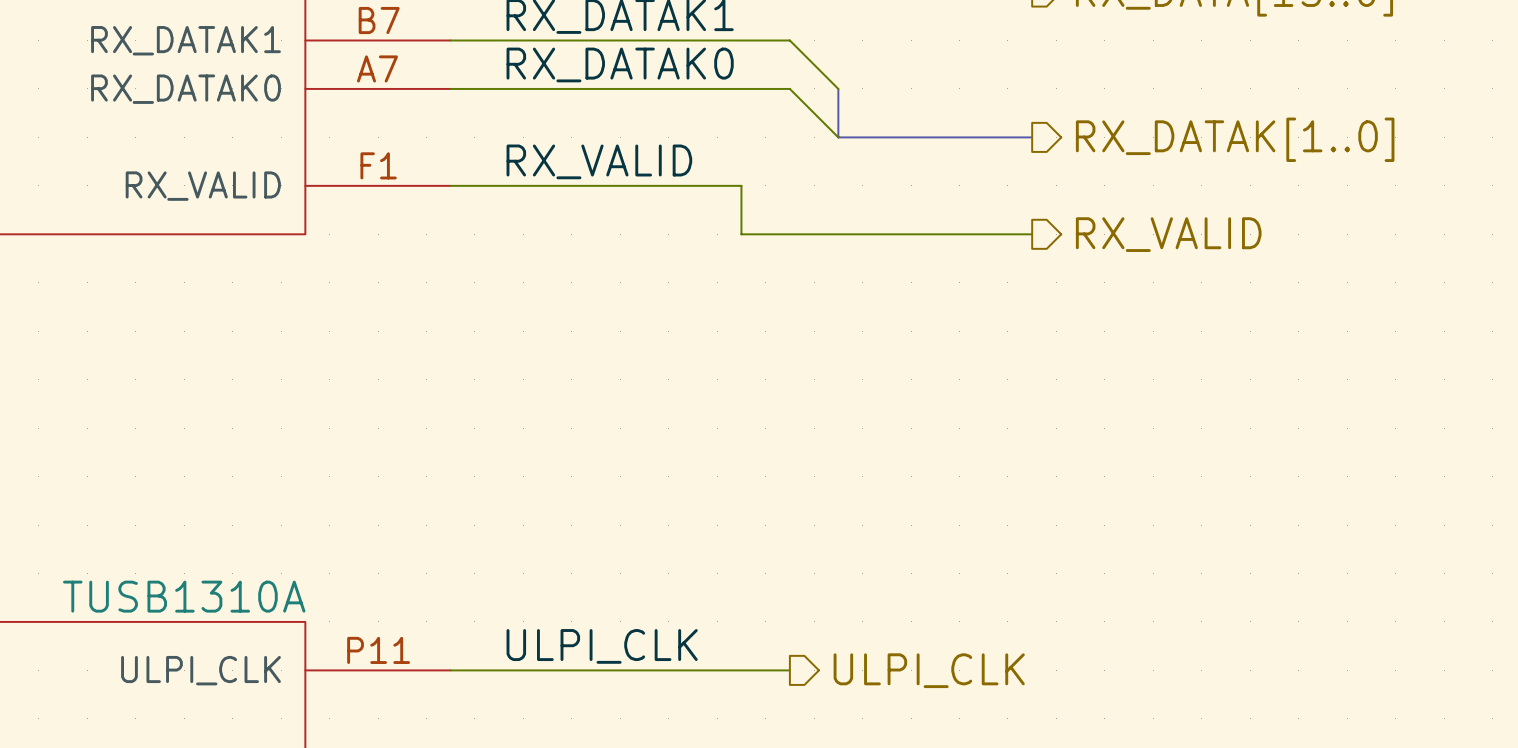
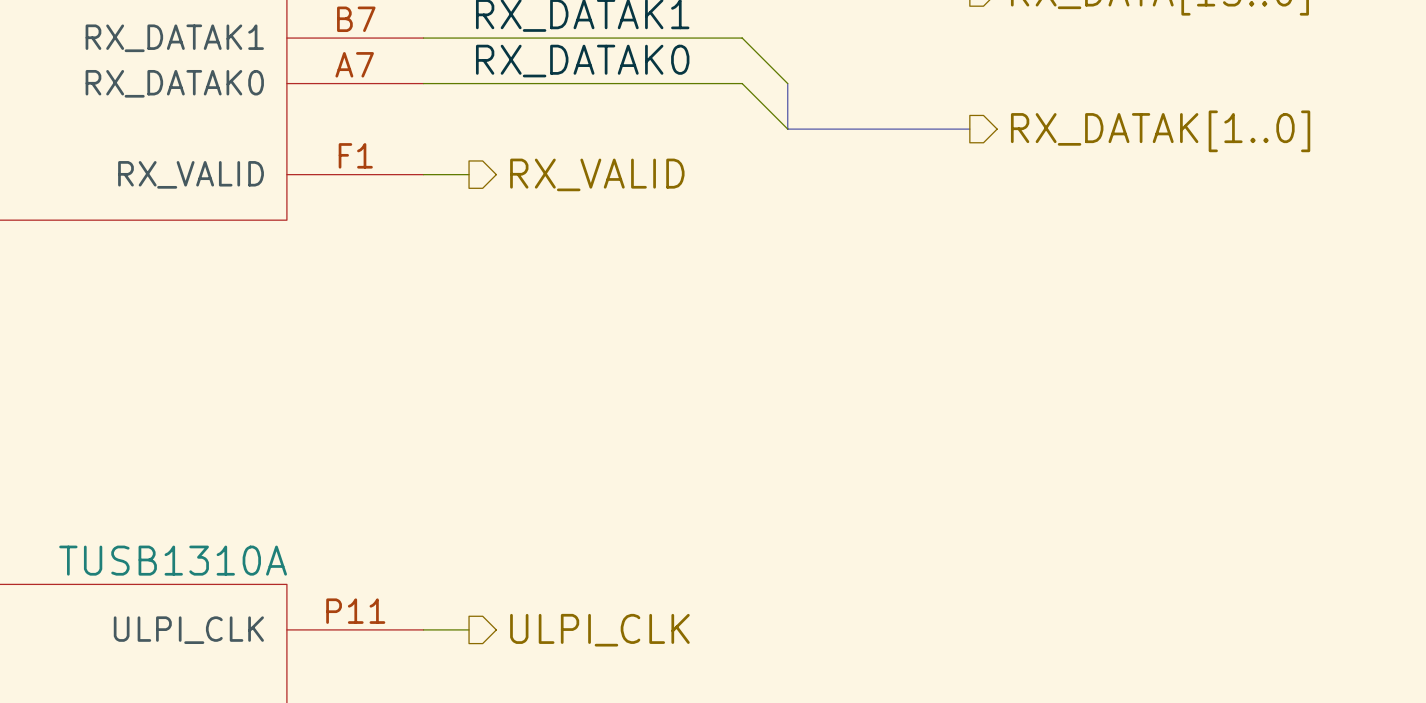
label: RX_VALID (599, 161) -> none
wire: (499, 185) (741, 185) (741, 234) (1032, 234) -> none
hierarchical label: none -> RX_VALID (597, 174)
hierarchical label: RX_VALID (1168, 234) -> none
label: ULPI_CLK (602, 646) -> none
wire: (499, 670) (789, 670) -> none
hierarchical label position: ULPI_CLK (929, 670) -> ULPI_CLK (599, 630)

